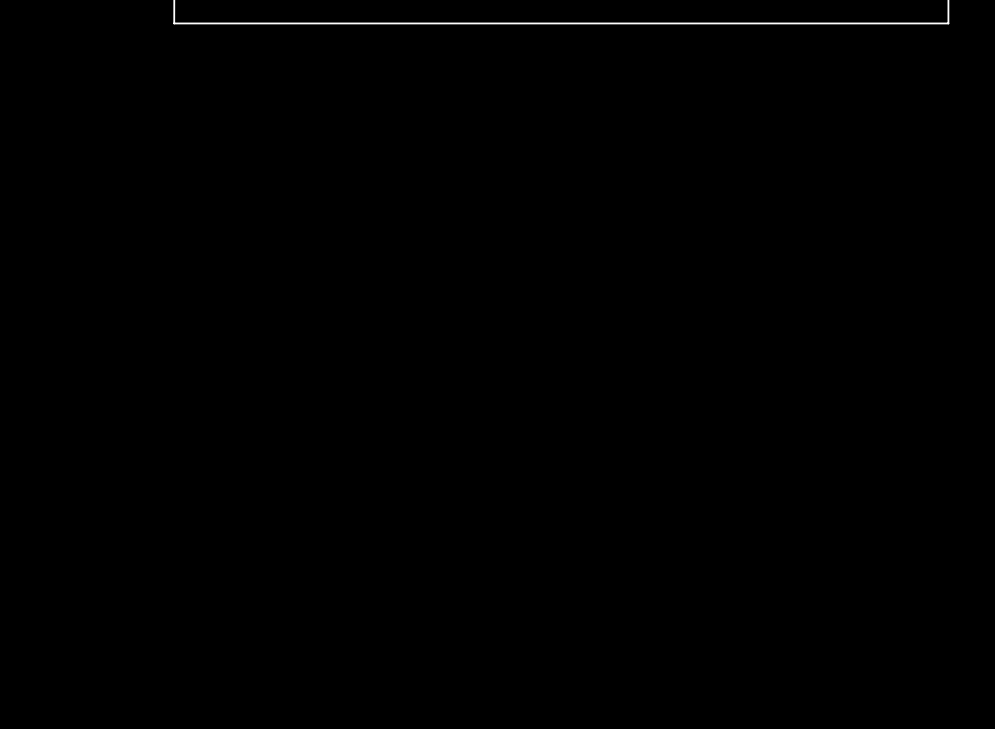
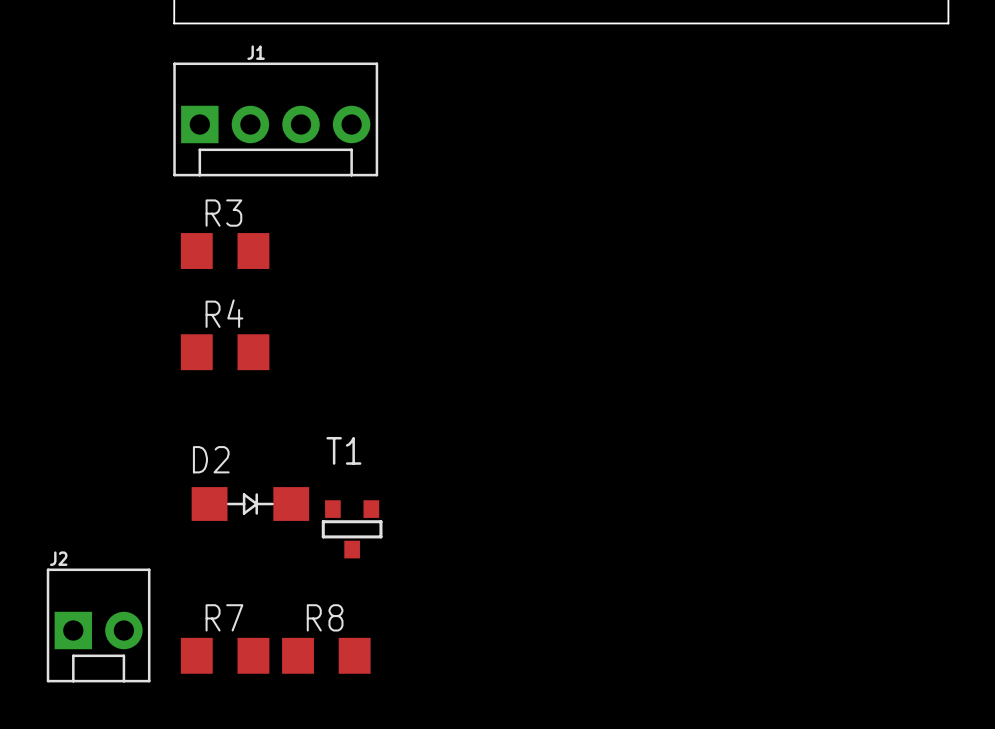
J1: none -> (275, 119)
R3: none -> (225, 251)
R4: none -> (225, 352)
D2: none -> (250, 504)
T1: none -> (352, 529)
J2: none -> (98, 625)
R7: none -> (225, 655)
R8: none -> (326, 655)

